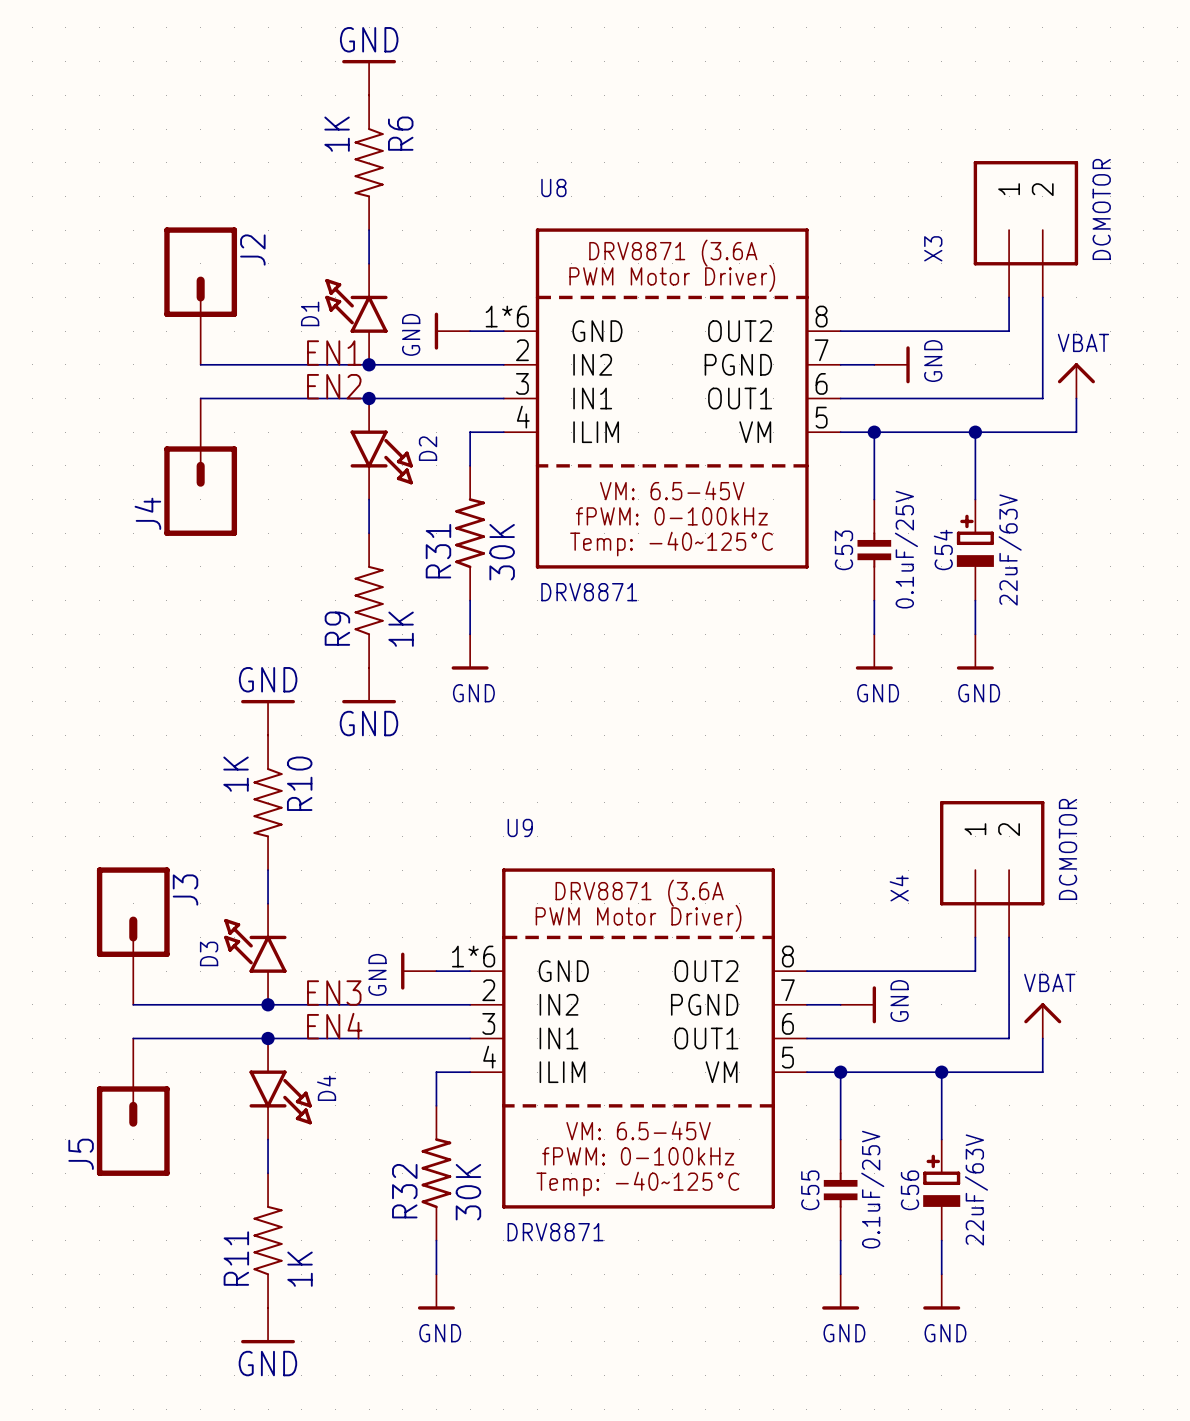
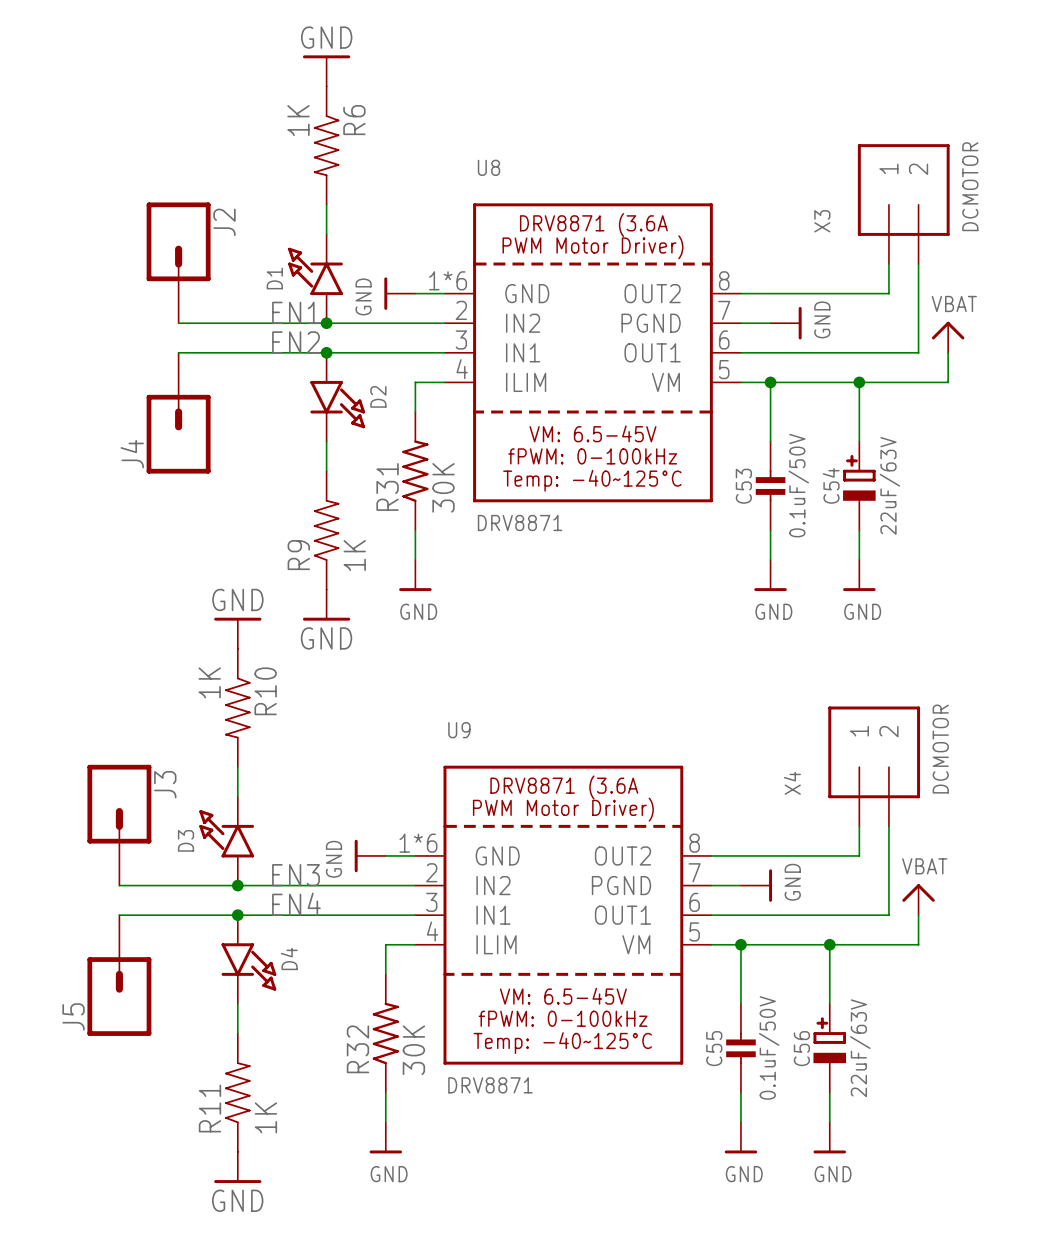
C53 value: 0.1uF/25V (906, 549) -> 0.1uF/50V (798, 485)
C55 value: 0.1uF/25V (872, 1189) -> 0.1uF/50V (769, 1047)

